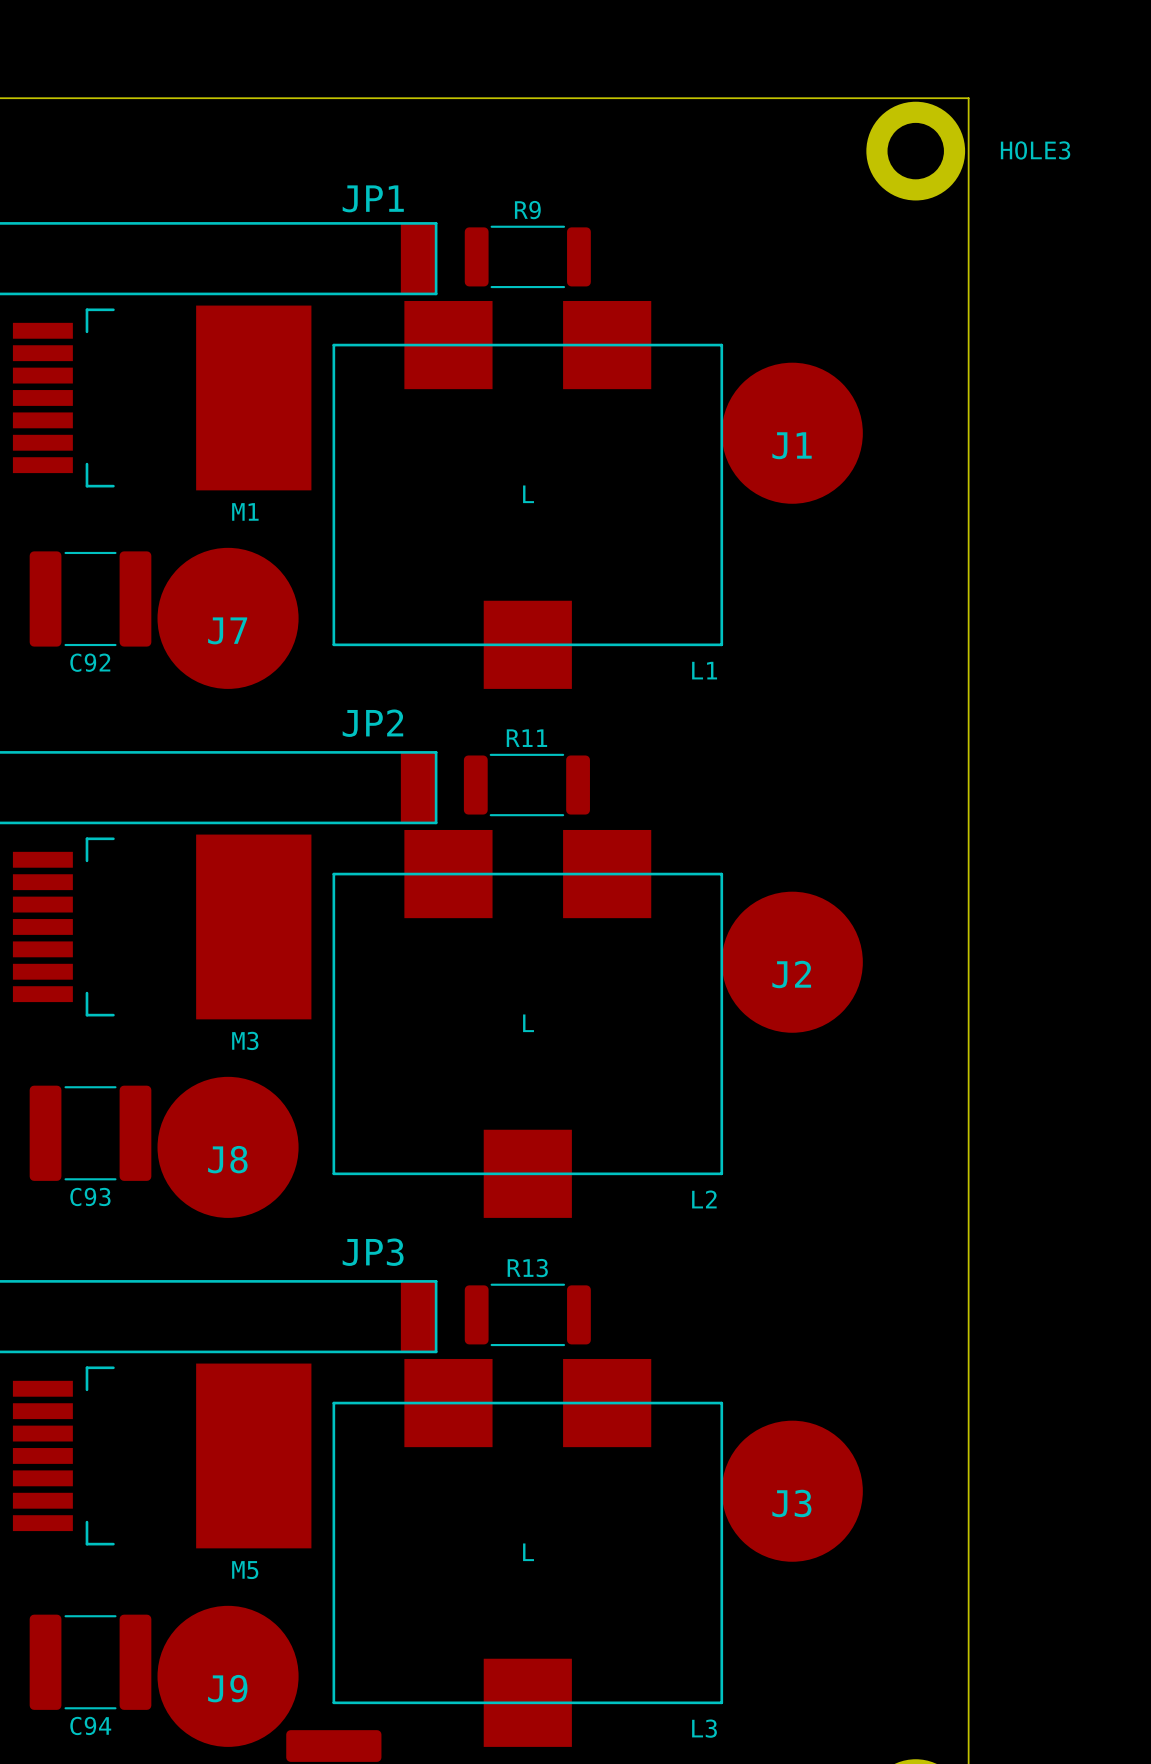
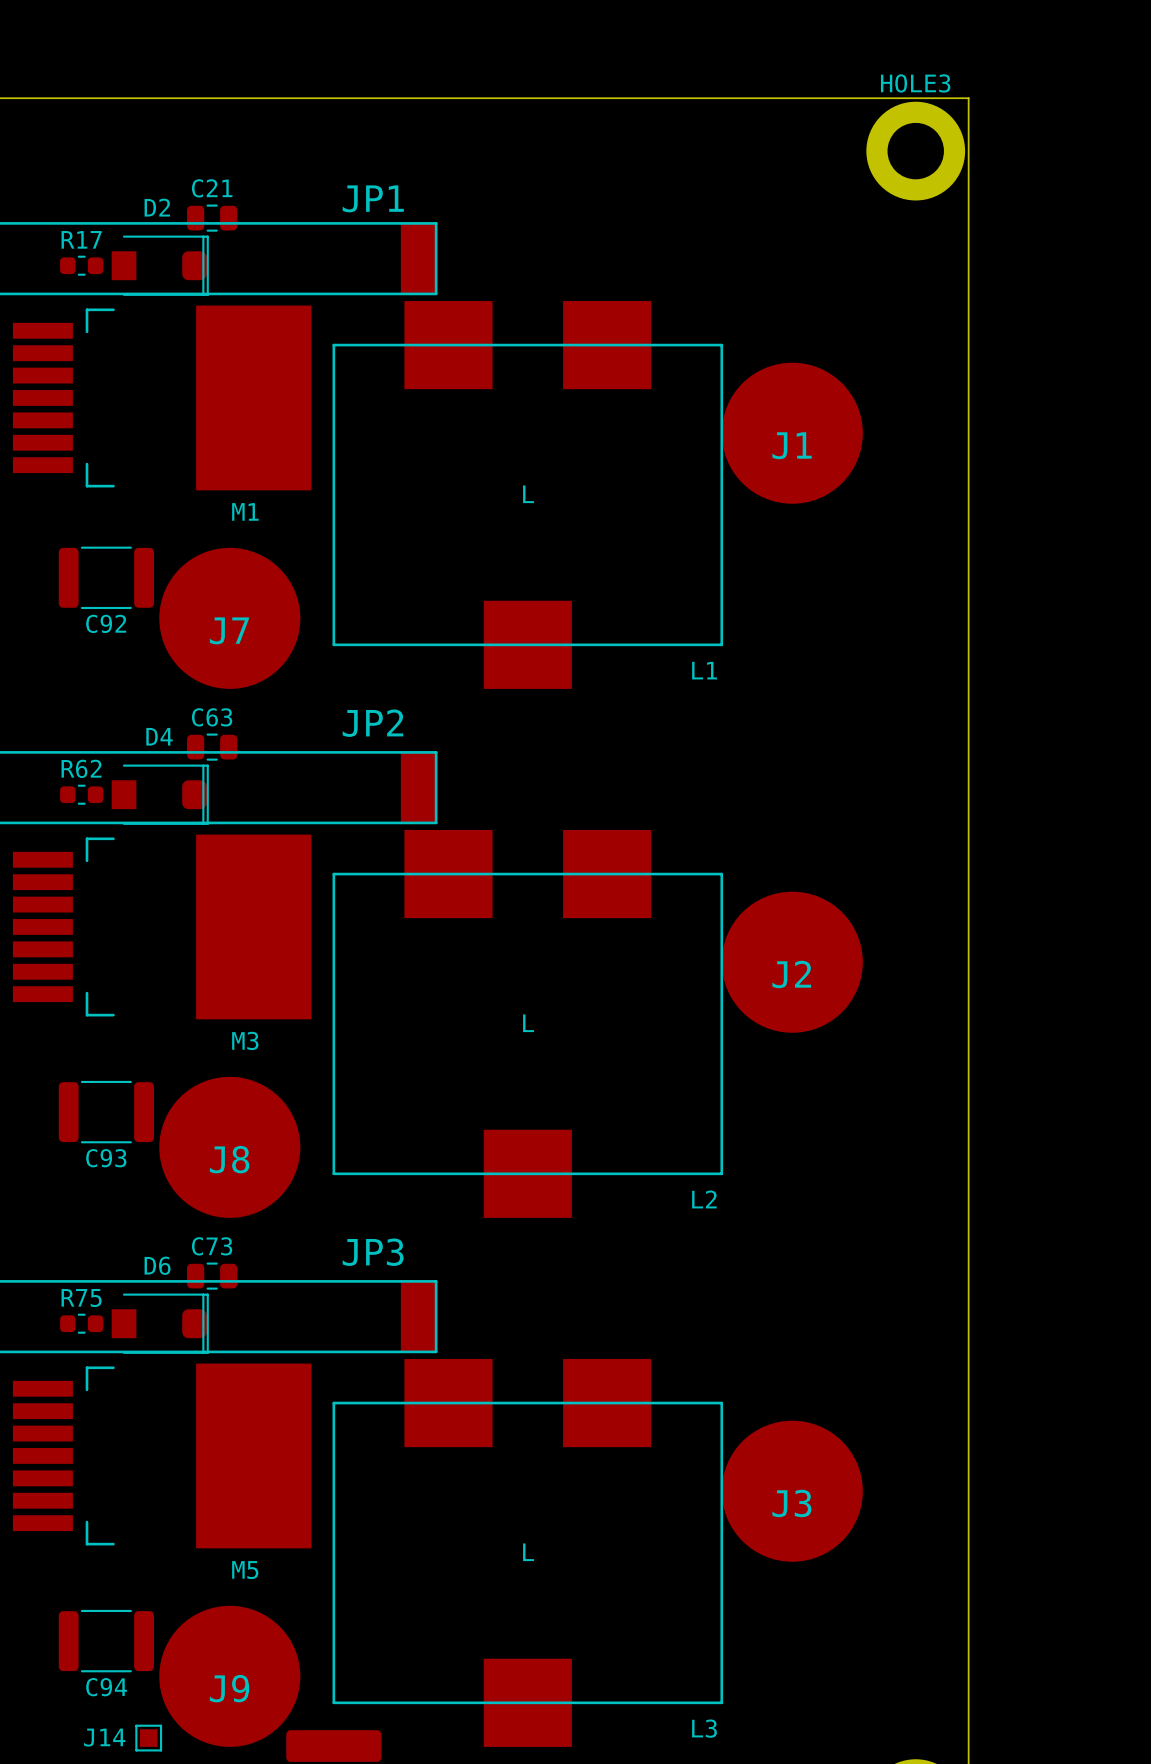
HOLE3 name position: HOLE3 (1035, 150) -> HOLE3 (915, 83)
C21: none -> (212, 218)
R9: (527, 256) -> none
R17: none -> (81, 265)
D2: none -> (160, 265)
J7 footprint: [157, 547, 299, 689] -> [159, 547, 301, 689]
C92 footprint: [29, 551, 152, 647] -> [58, 546, 154, 610]
C63: none -> (212, 747)
R11: (526, 785) -> none
R62: none -> (81, 794)
D4: none -> (160, 794)
J8 footprint: [157, 1076, 299, 1218] -> [159, 1076, 301, 1218]
C93 footprint: [29, 1085, 152, 1181] -> [58, 1080, 154, 1144]
C73: none -> (212, 1276)
R13: (527, 1314) -> none
R75: none -> (81, 1323)
D6: none -> (160, 1323)
J9 footprint: [157, 1605, 299, 1747] -> [159, 1605, 301, 1747]
C94 footprint: [29, 1614, 152, 1710] -> [58, 1609, 154, 1673]
J14: none -> (148, 1738)

